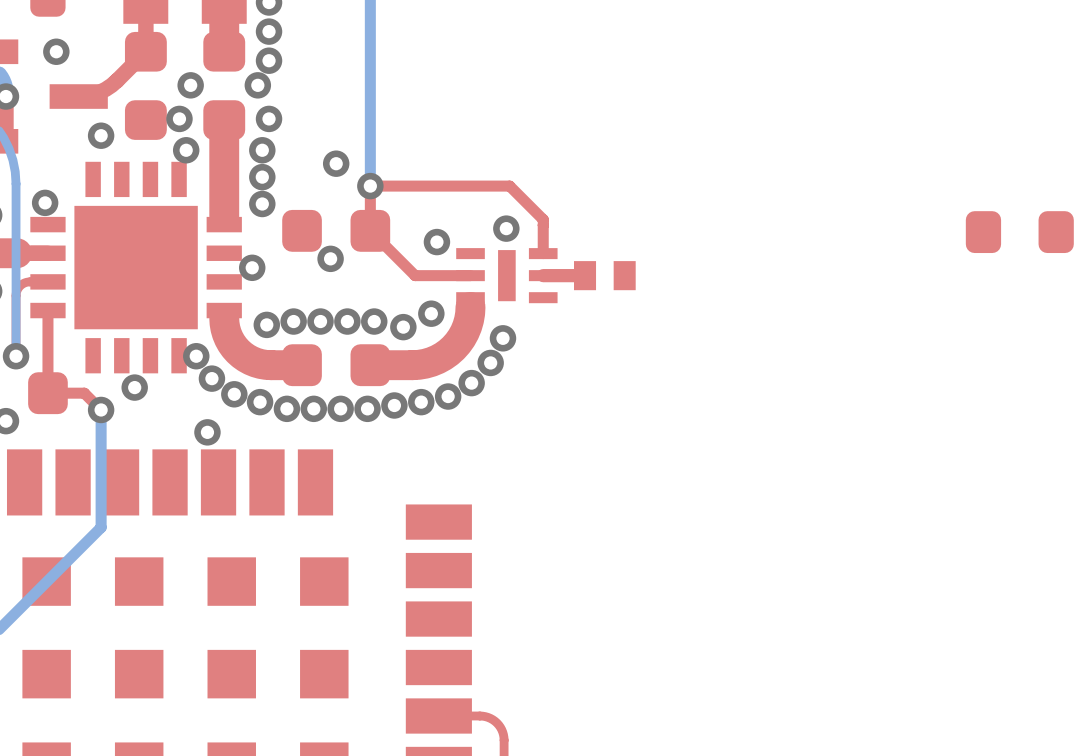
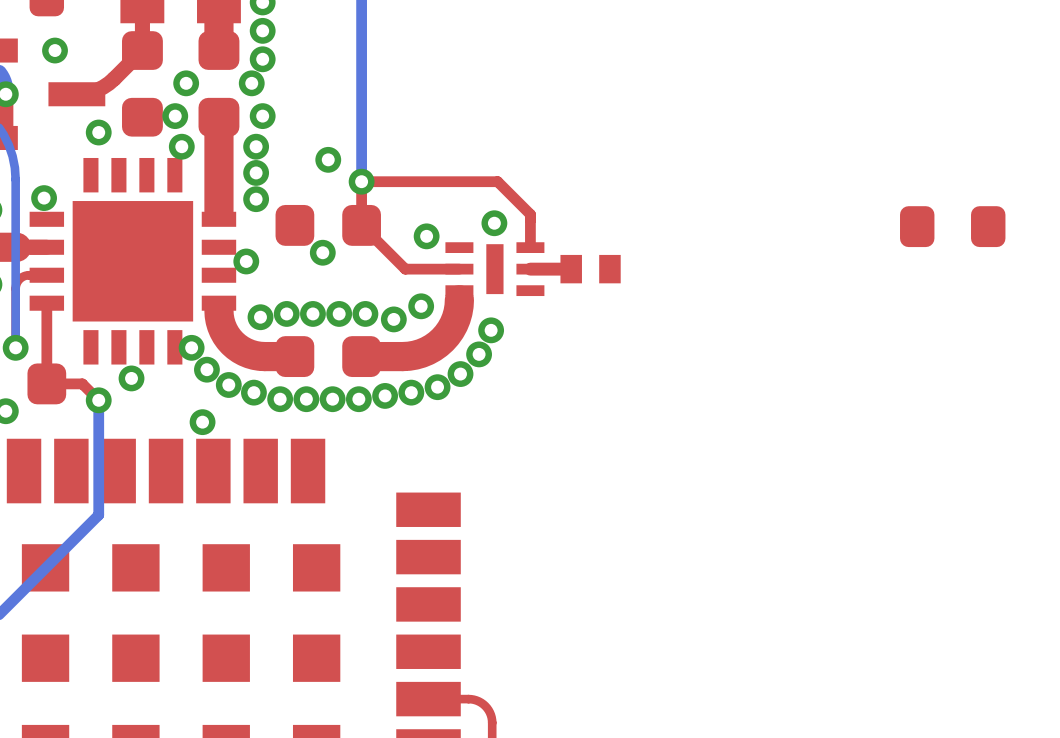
part position: (1019, 232) -> (952, 226)

